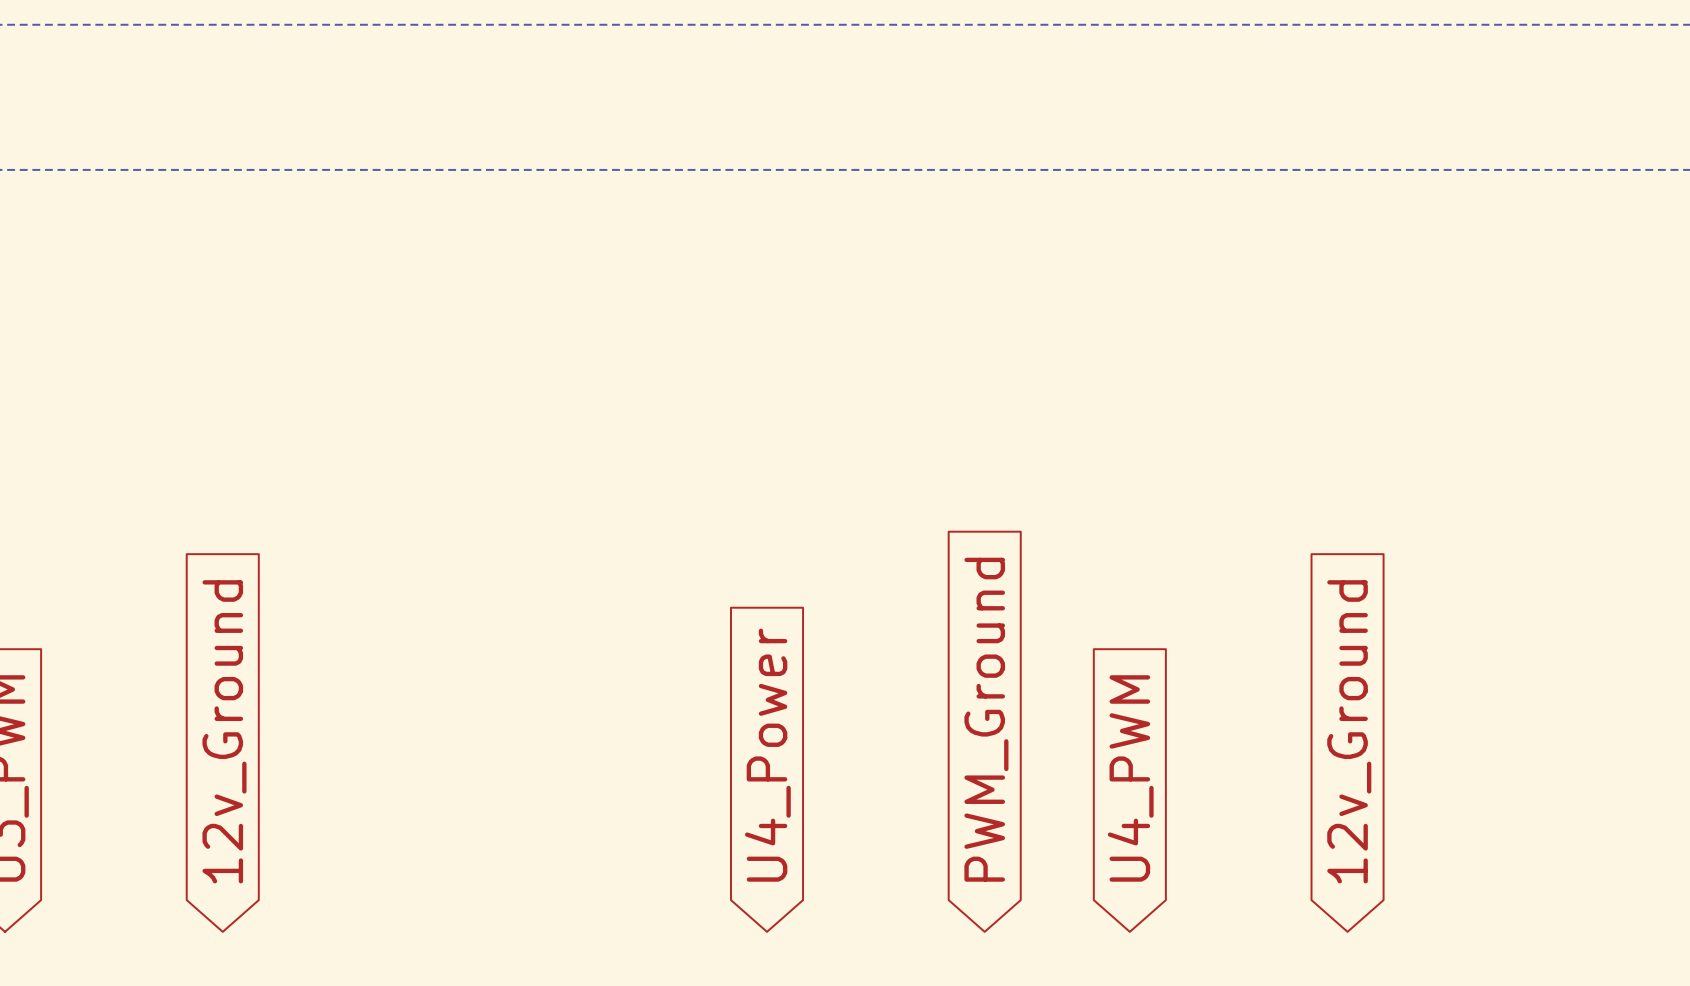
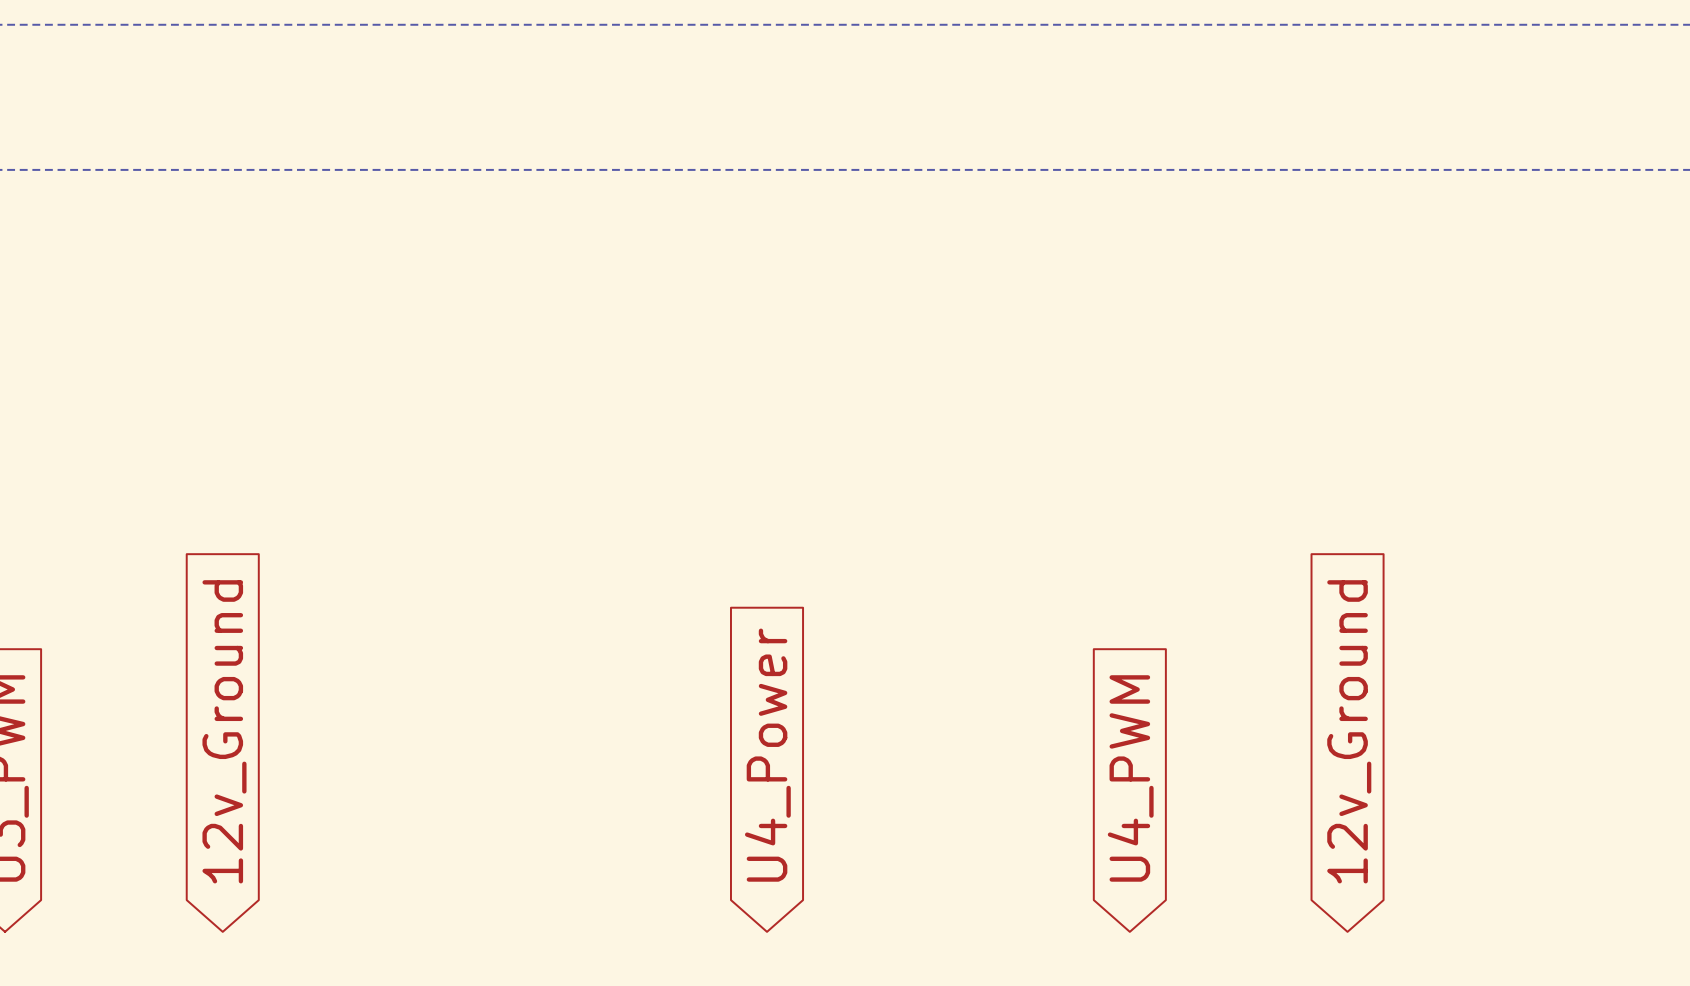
global label: PWM_Ground (986, 719) -> none

